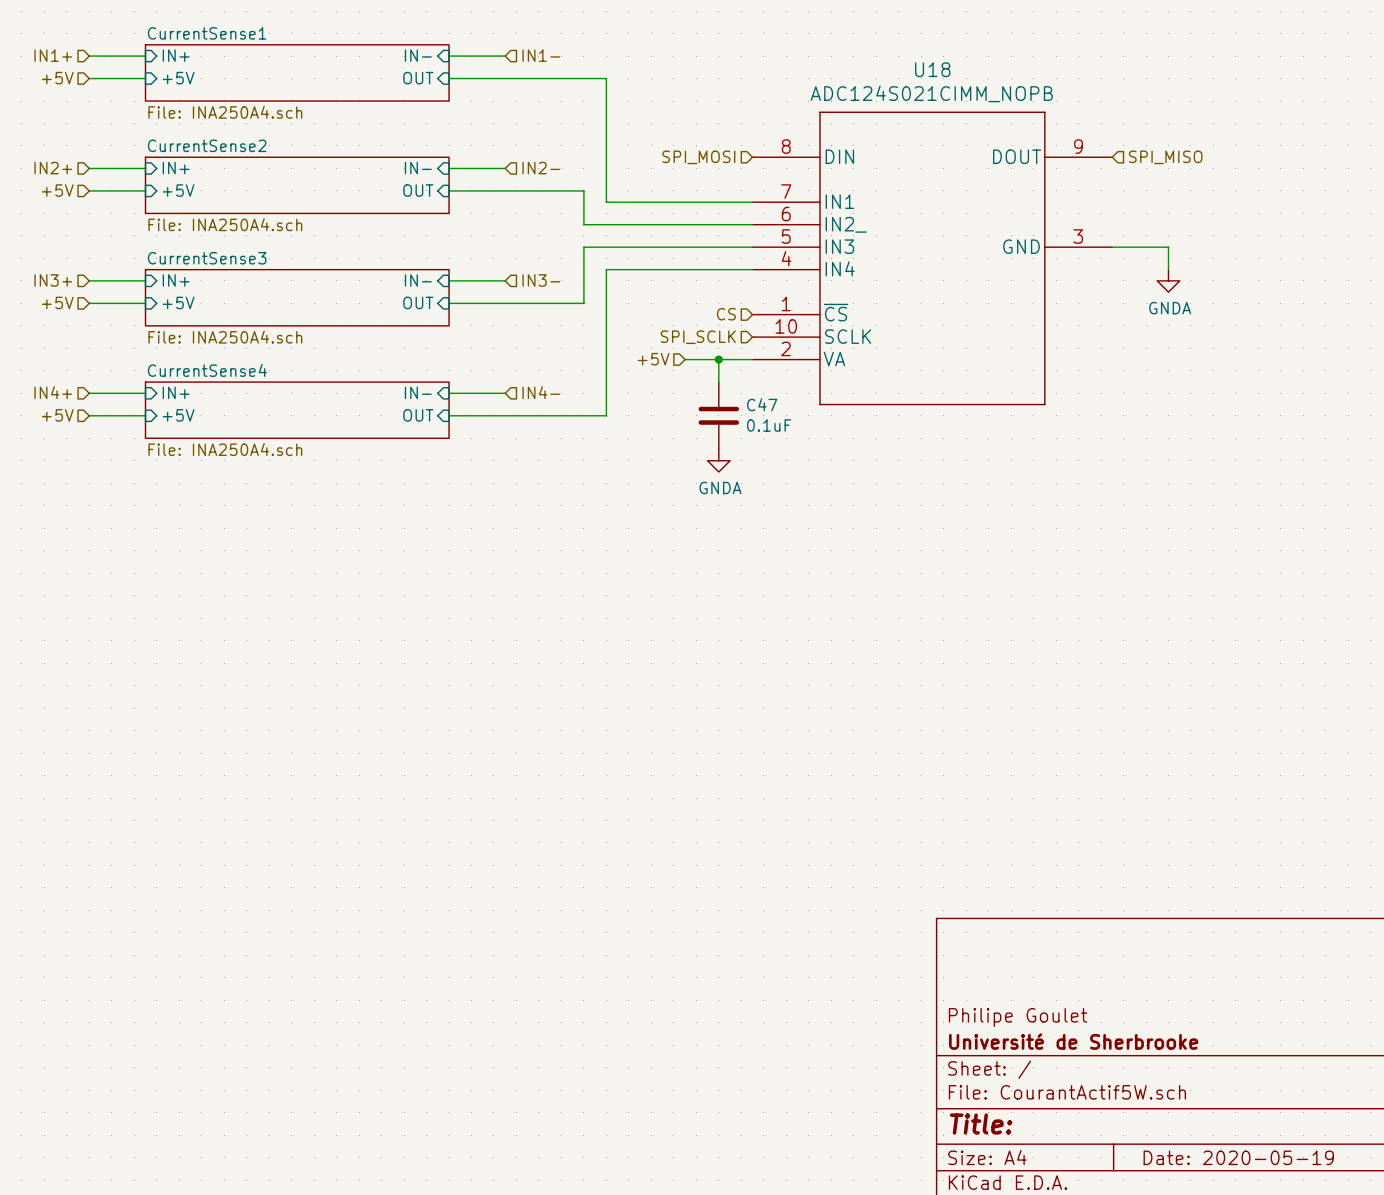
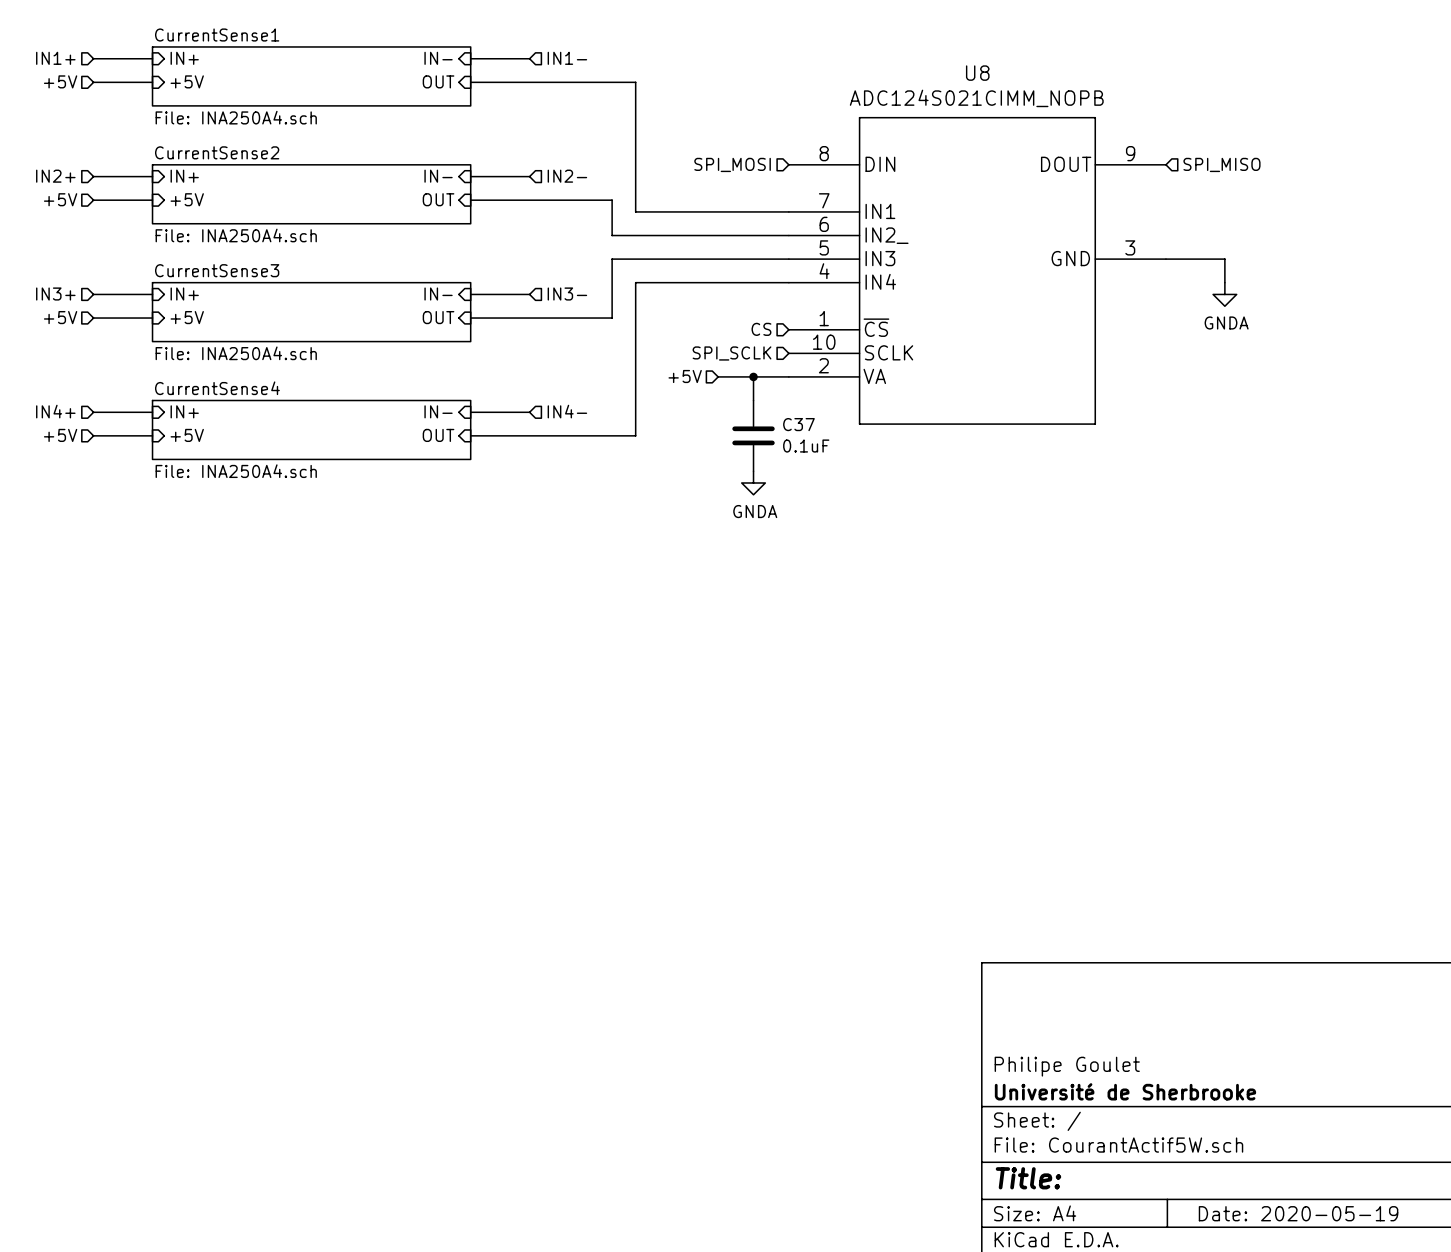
U18 name: U18 (932, 69) -> U8 (977, 73)
C47 name: C47 (762, 404) -> C37 (798, 424)

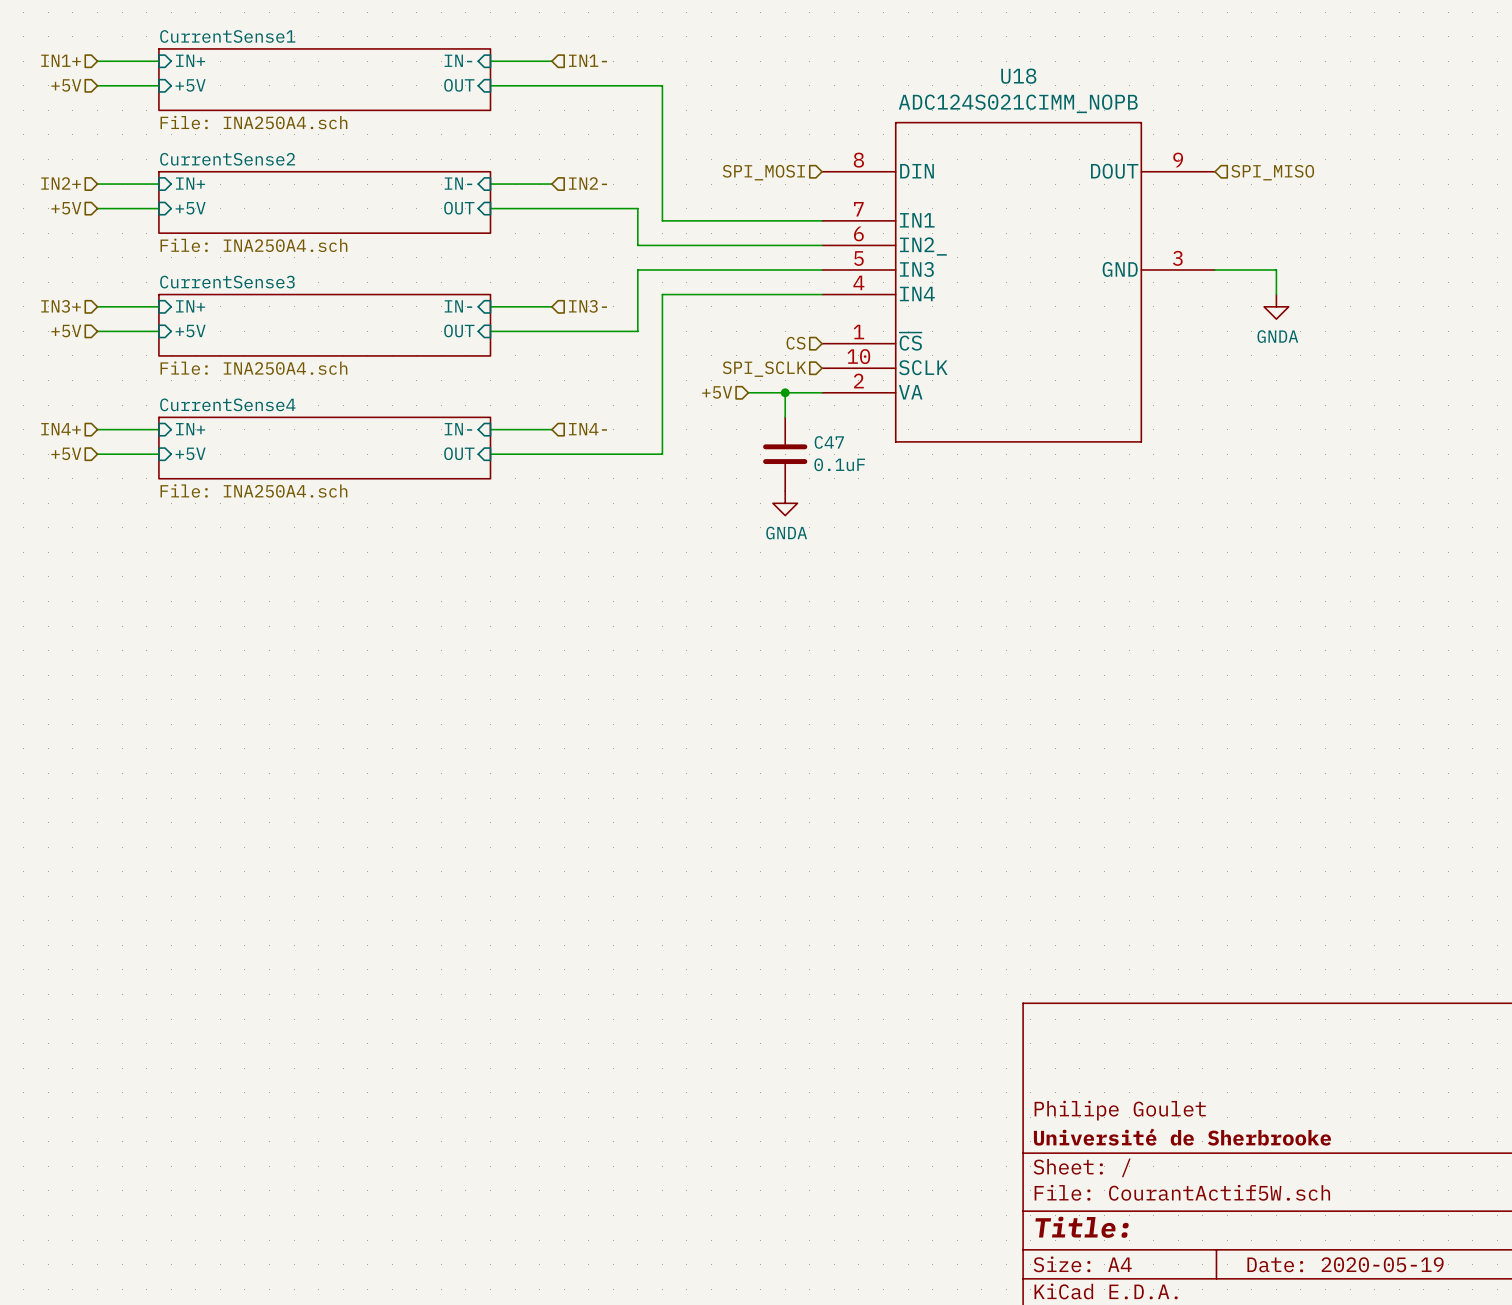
U8 name: U8 (977, 73) -> U18 (1018, 76)
C37 name: C37 (798, 424) -> C47 (829, 442)

